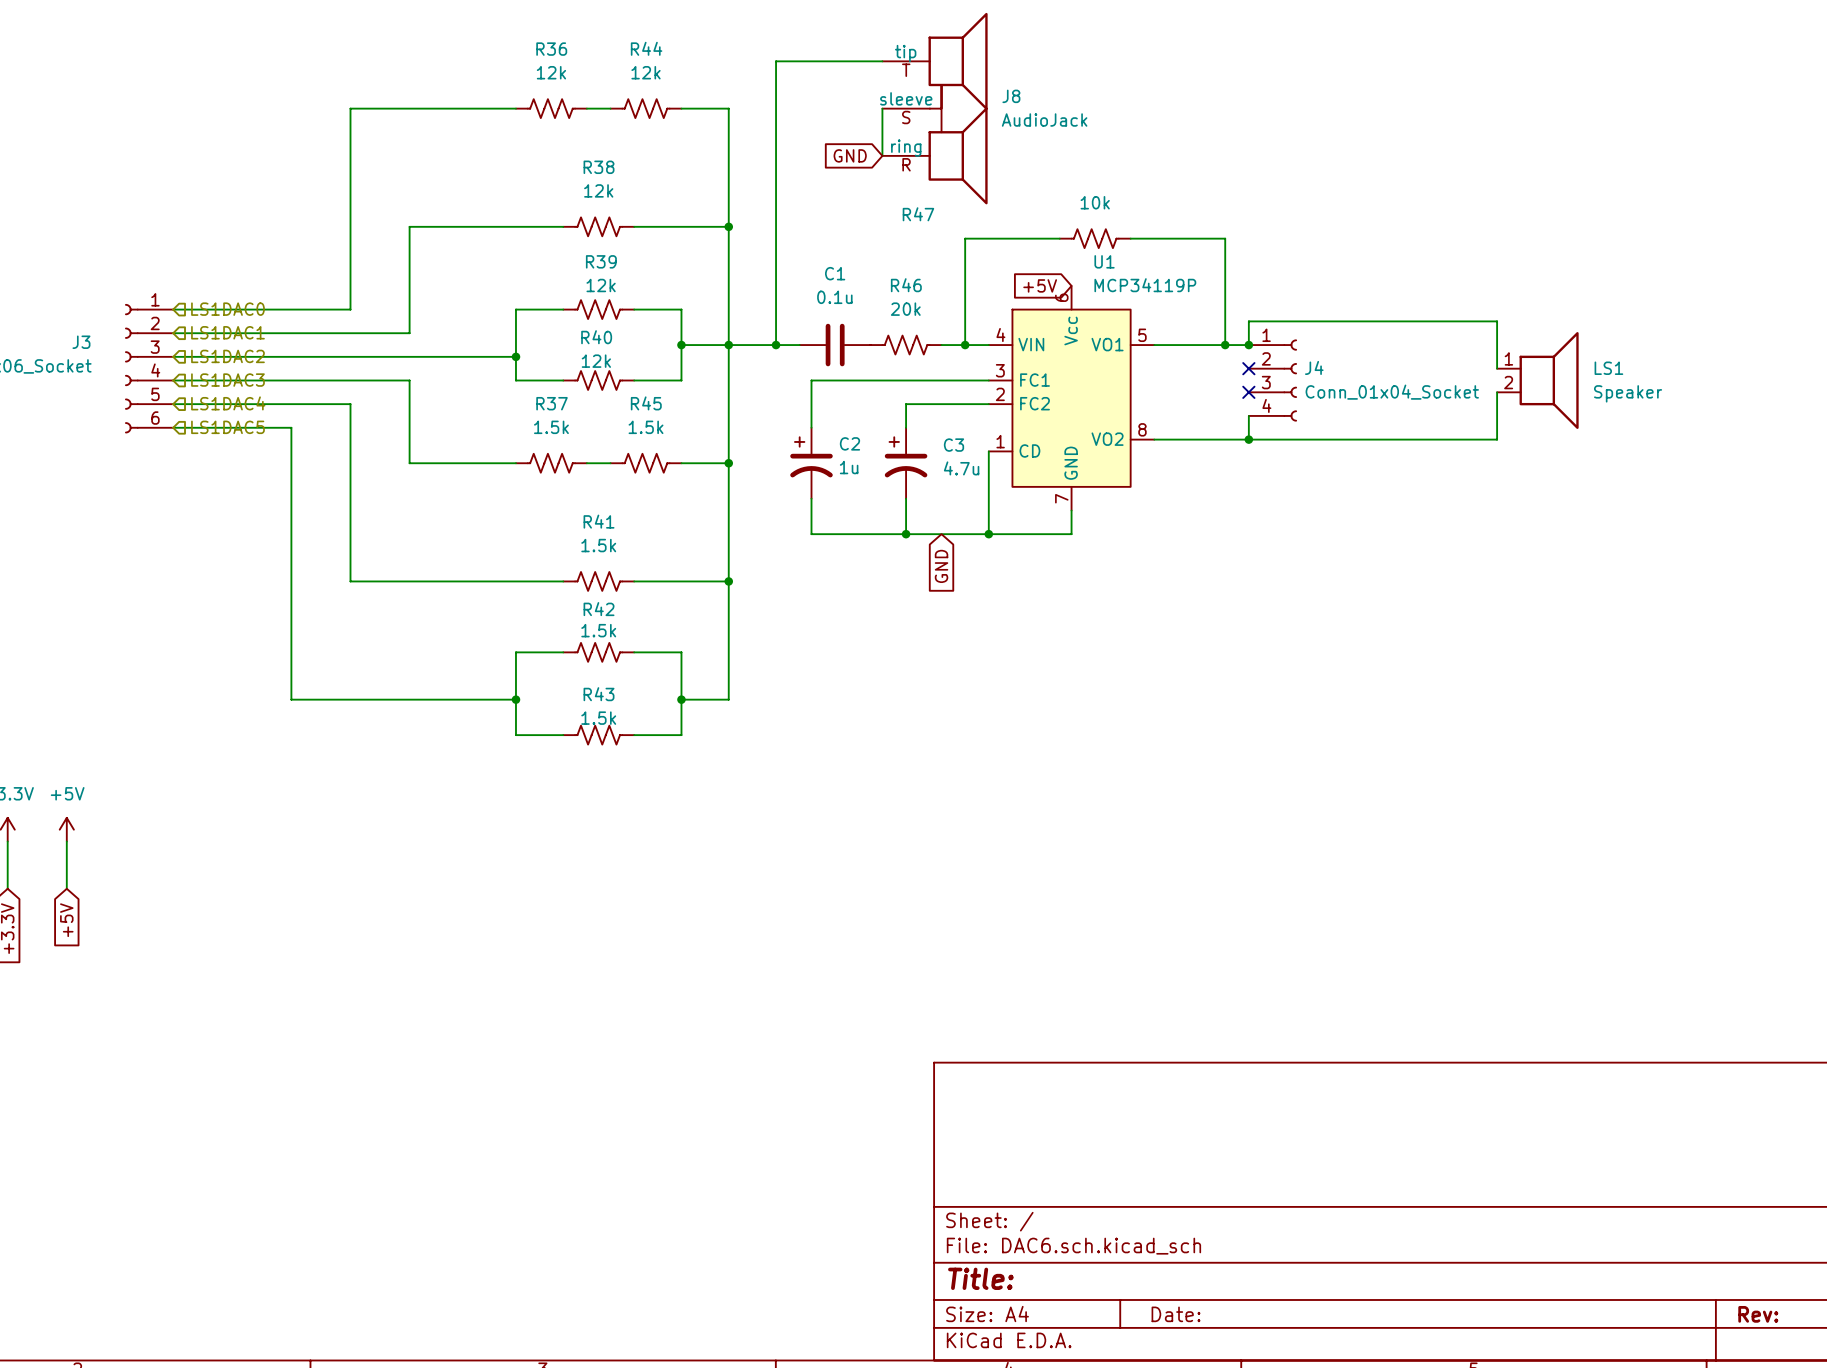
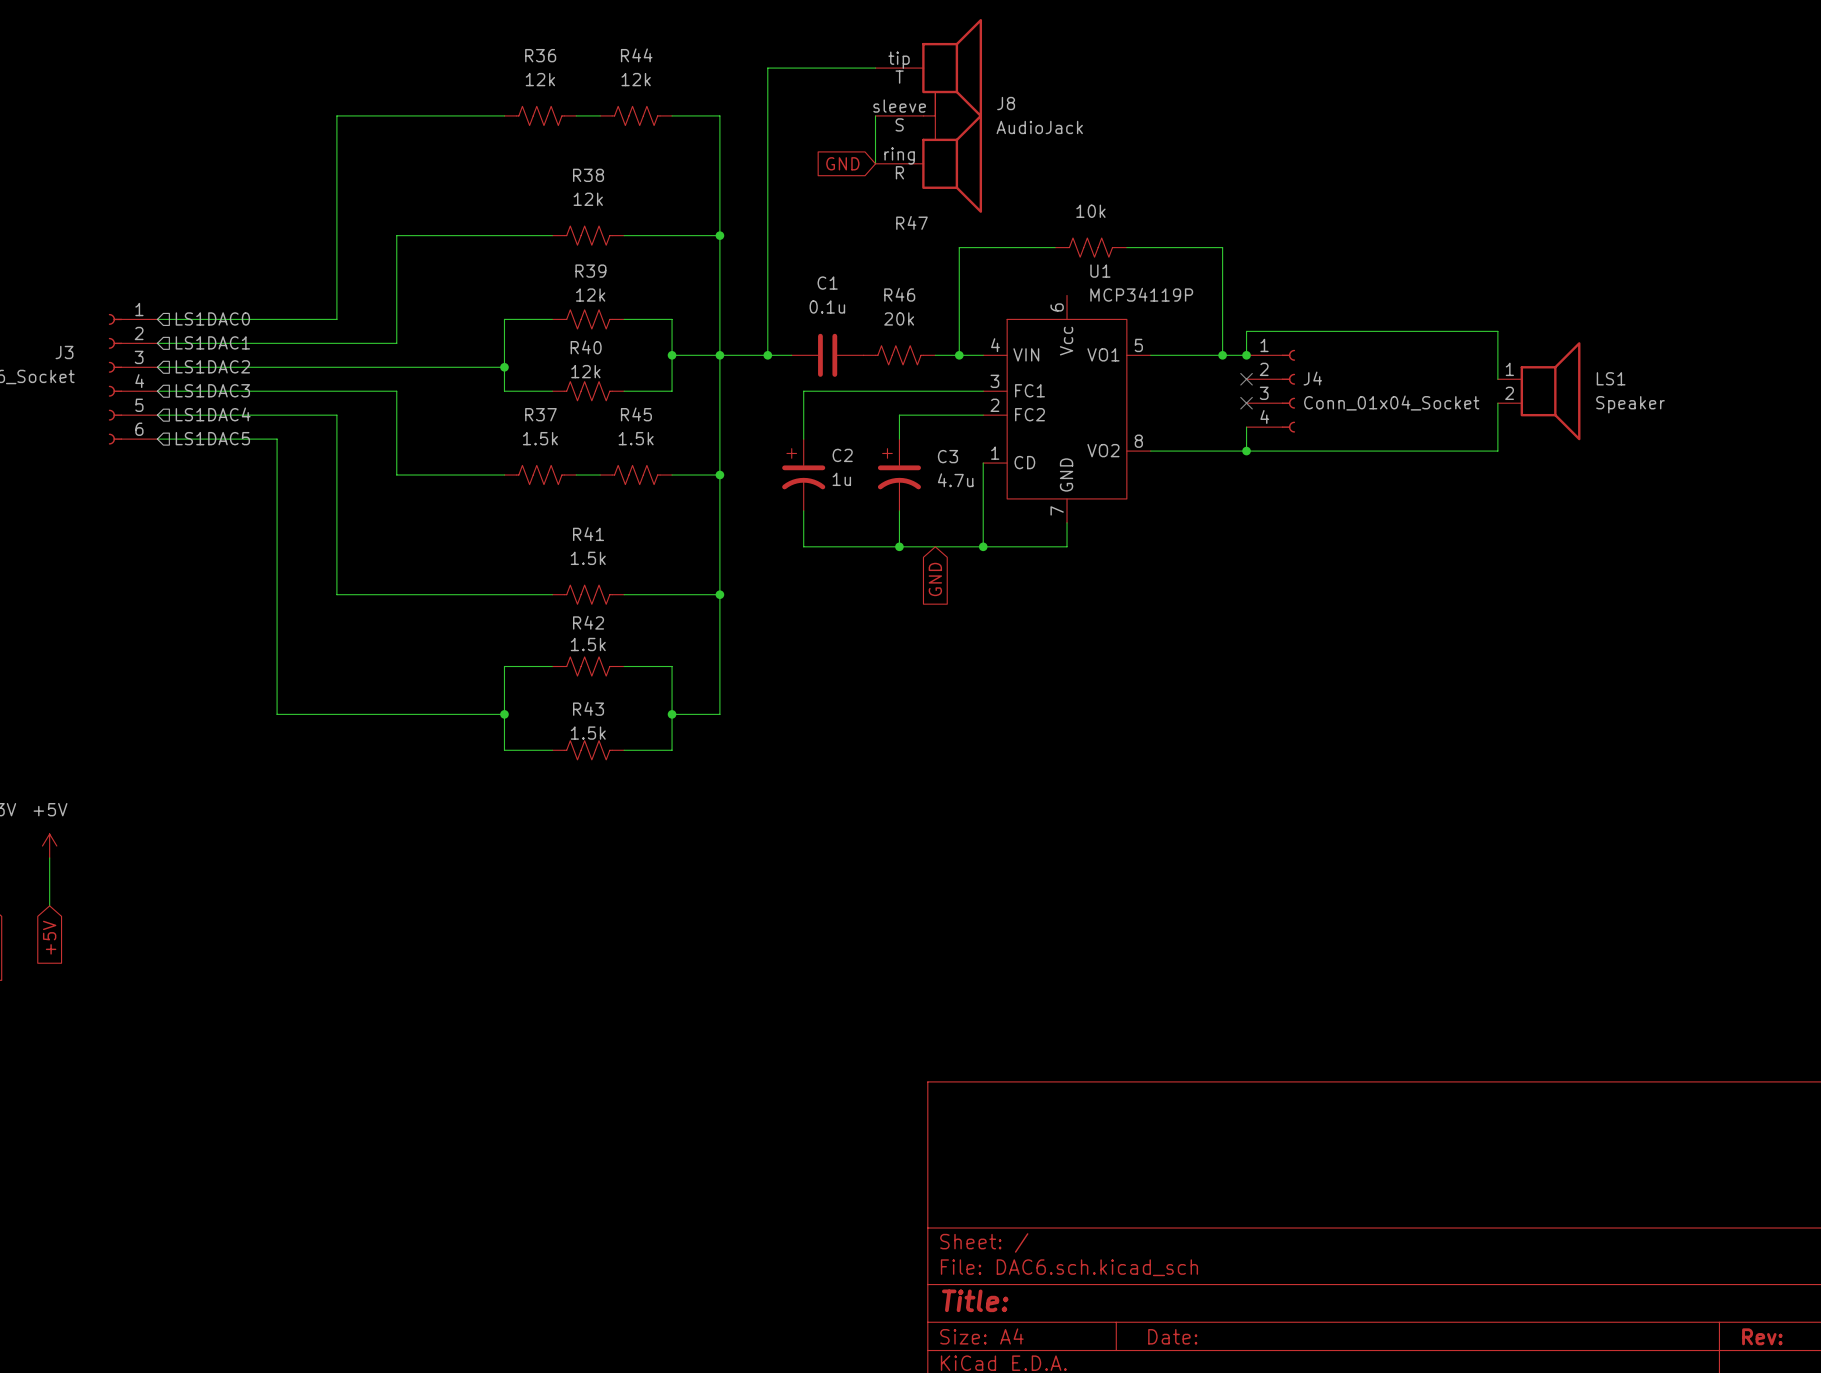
global label: +5V (1040, 285) -> none

